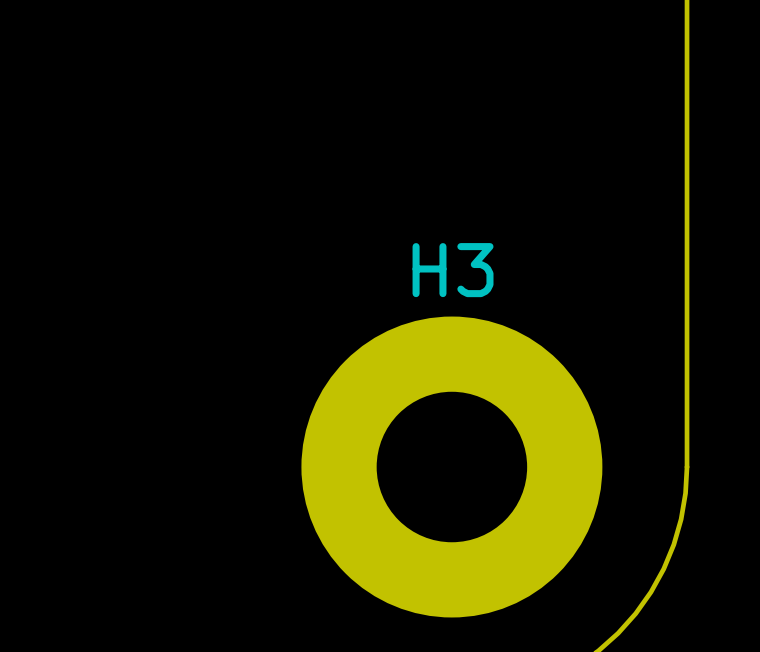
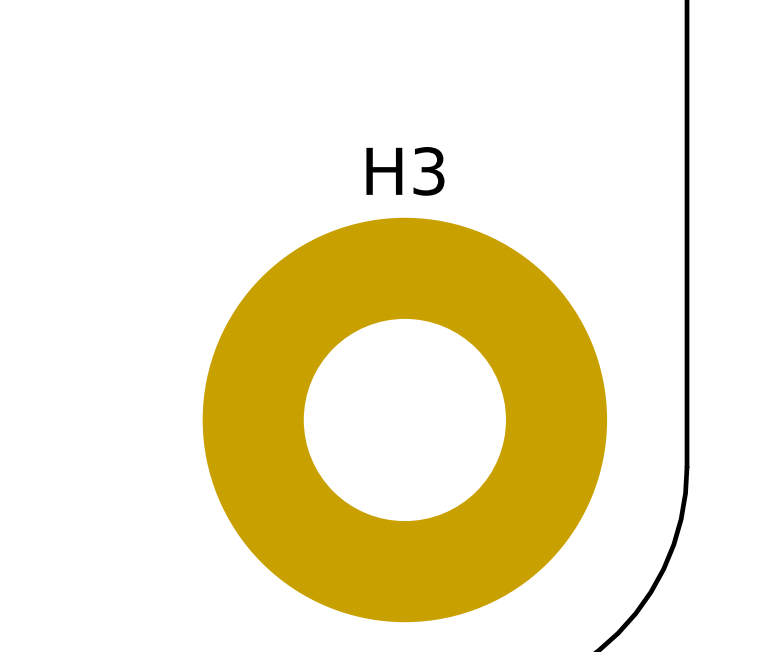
H3 footprint: [301, 316, 603, 618] -> [202, 217, 608, 623]

